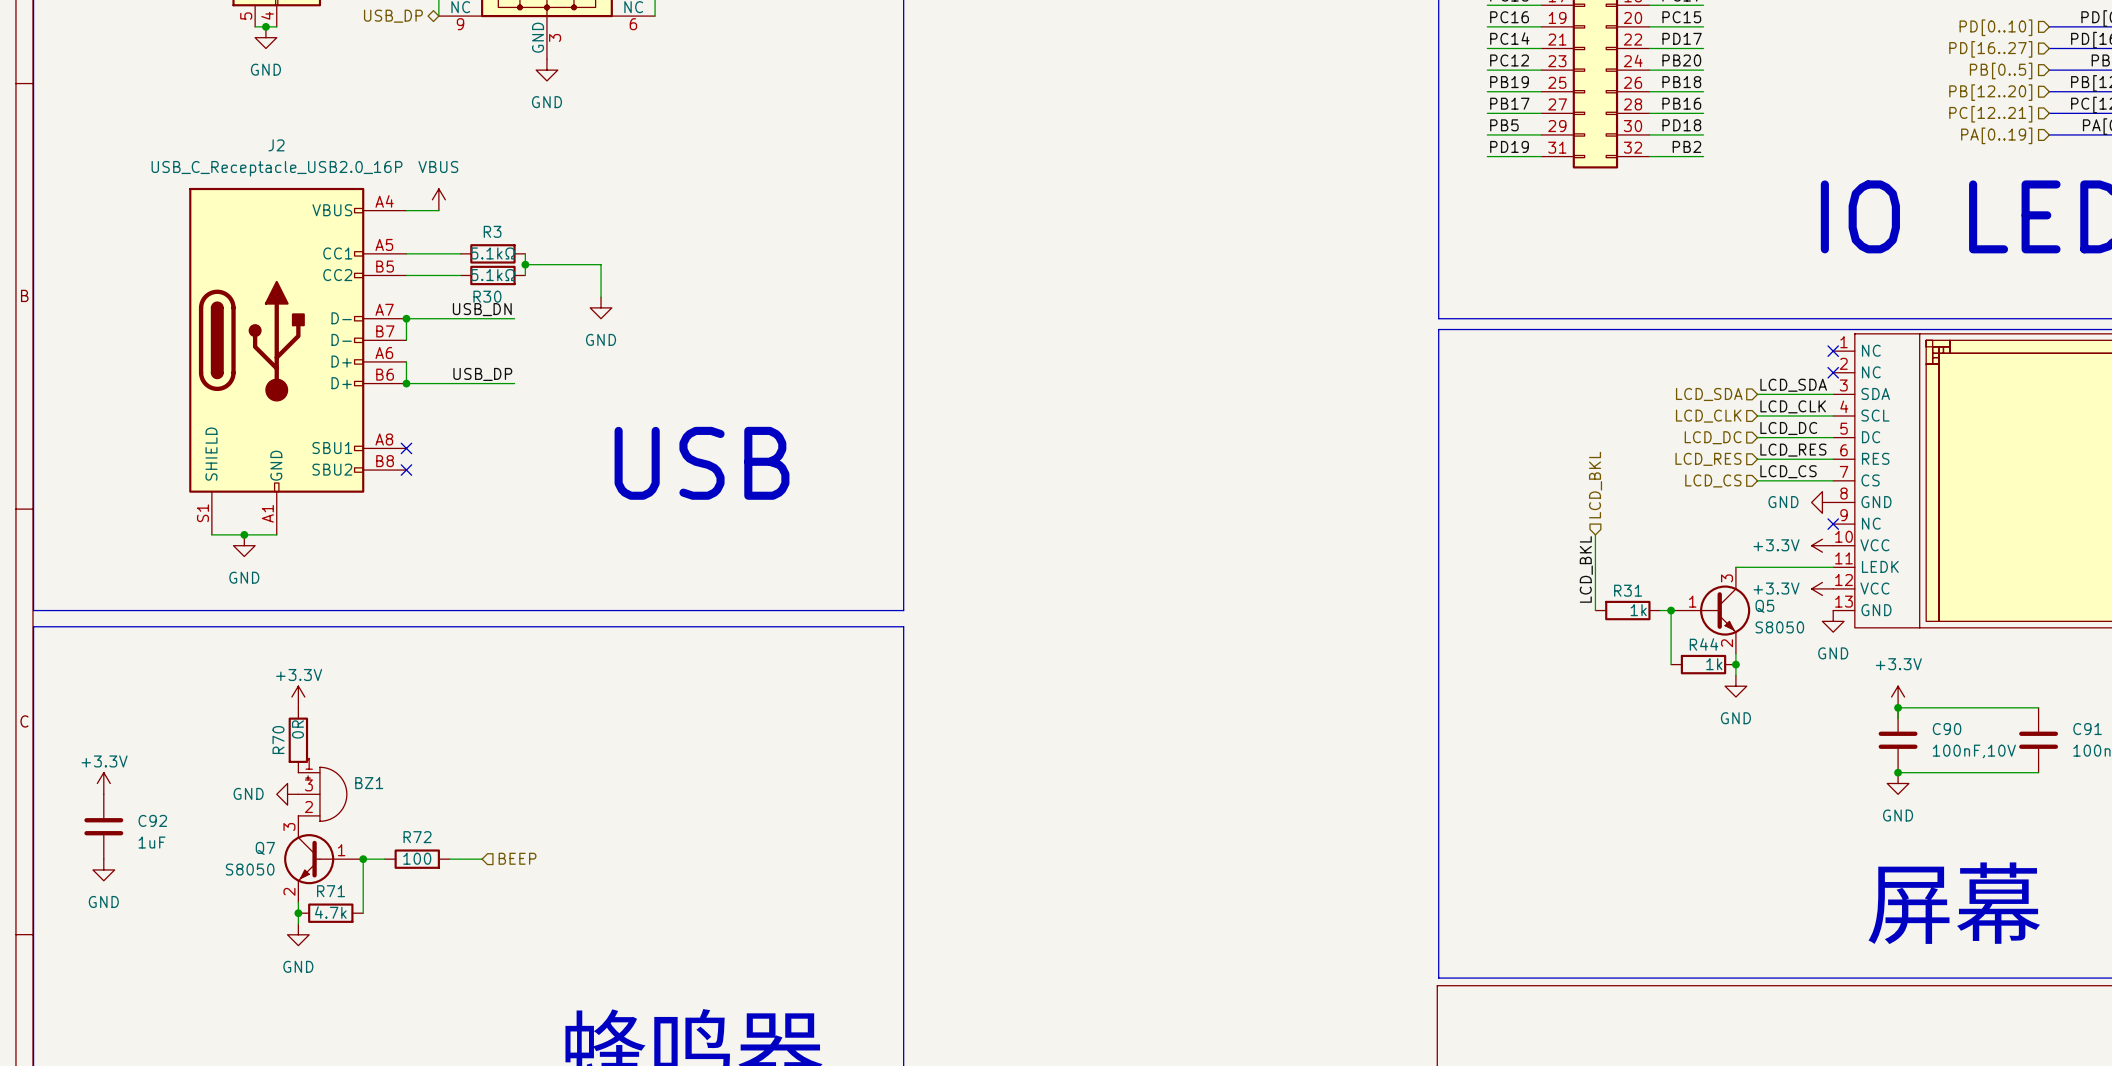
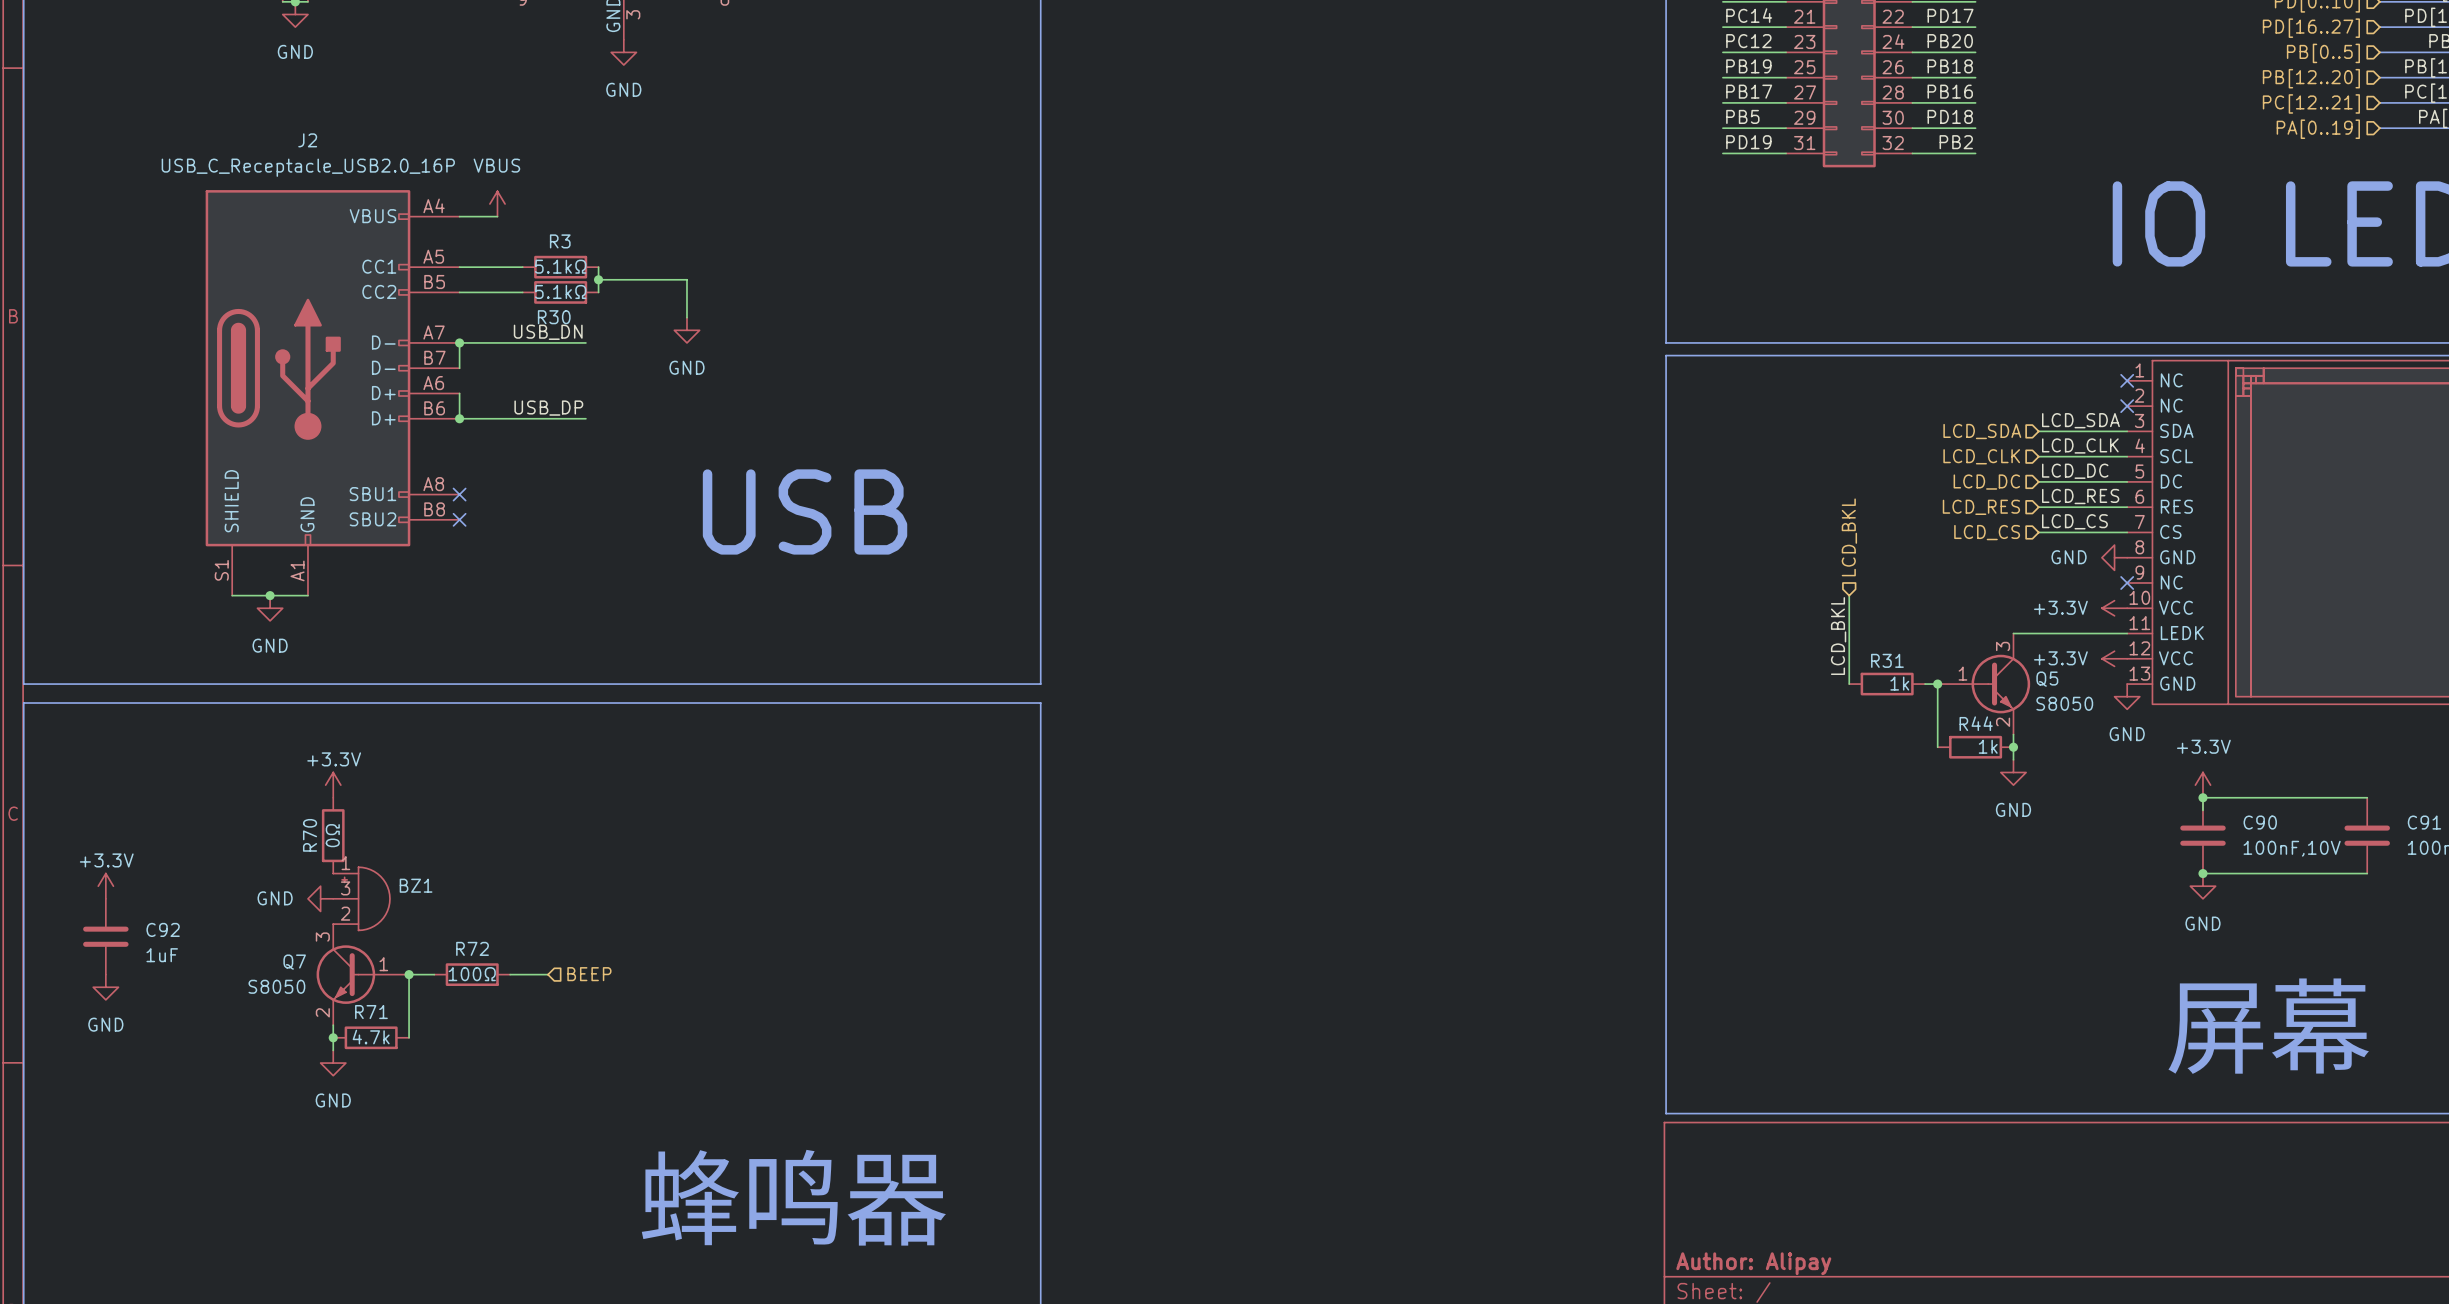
R70 value: 0R (297, 729) -> 0Ω (332, 835)
R72 value: 100 (417, 858) -> 100Ω (472, 974)

